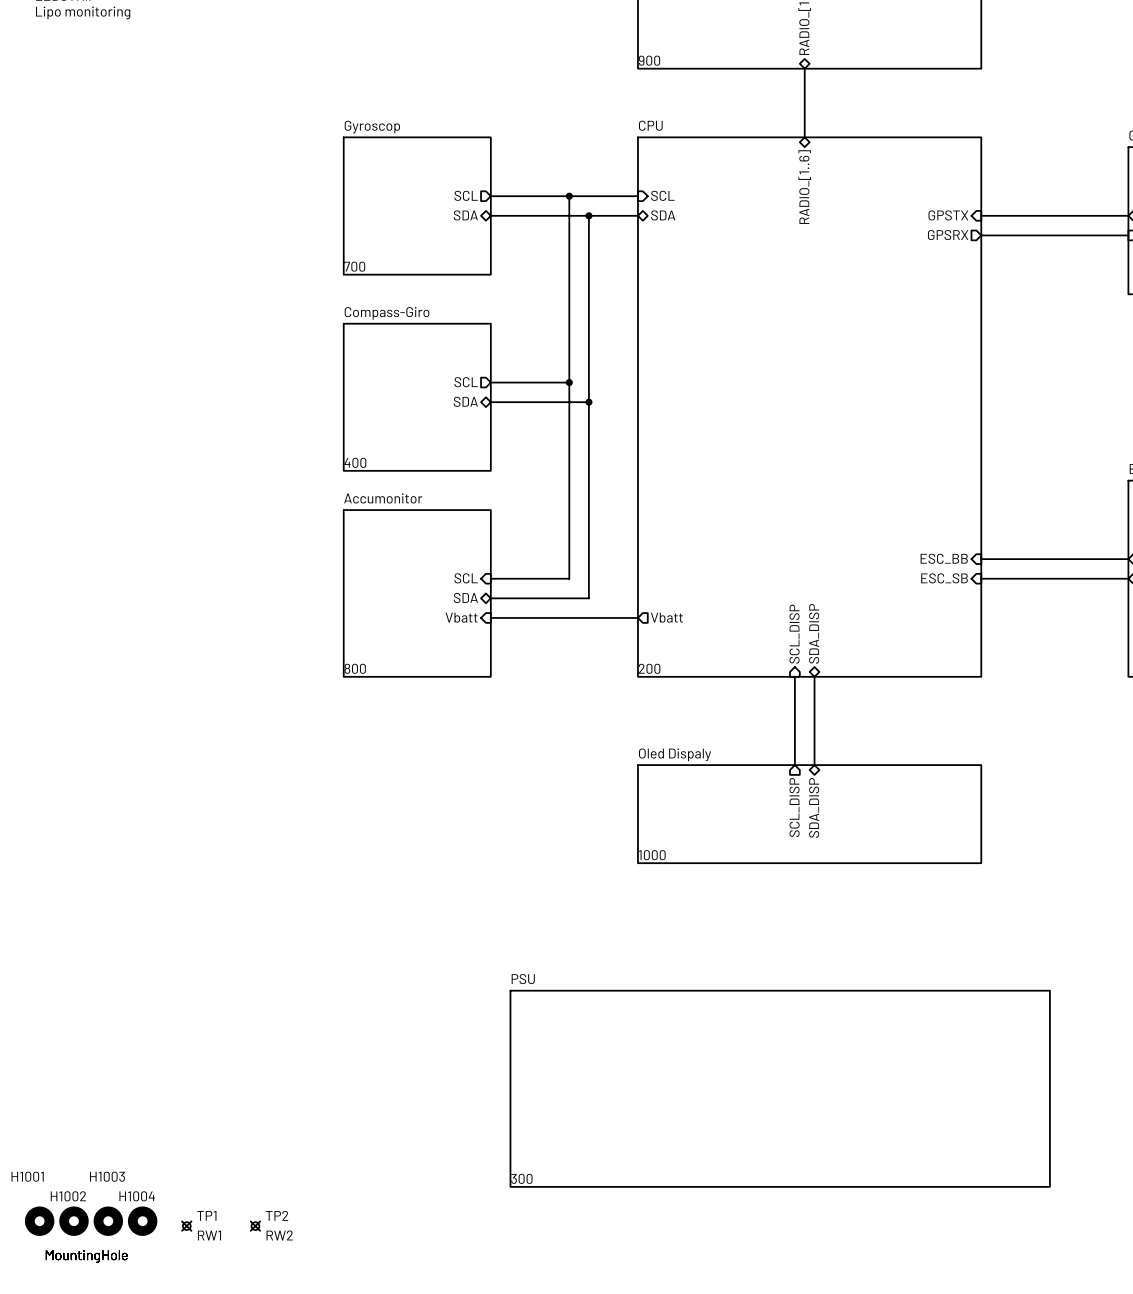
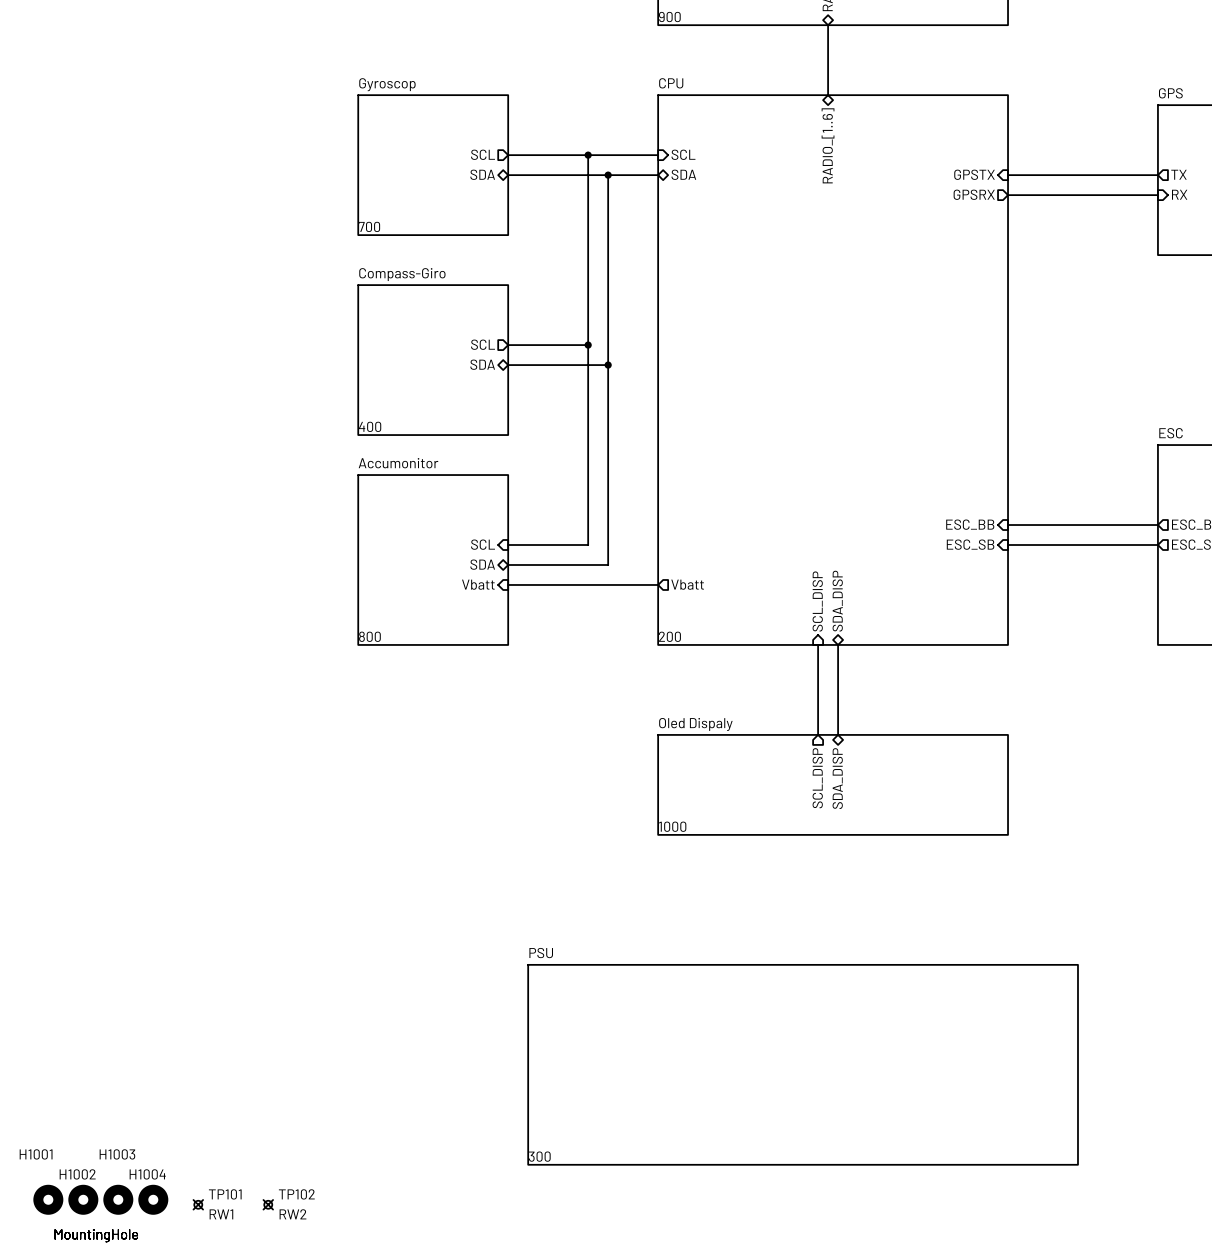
TP1 name: TP1 (206, 1215) -> TP101 (225, 1194)
TP2 name: TP2 (277, 1215) -> TP102 (296, 1194)

